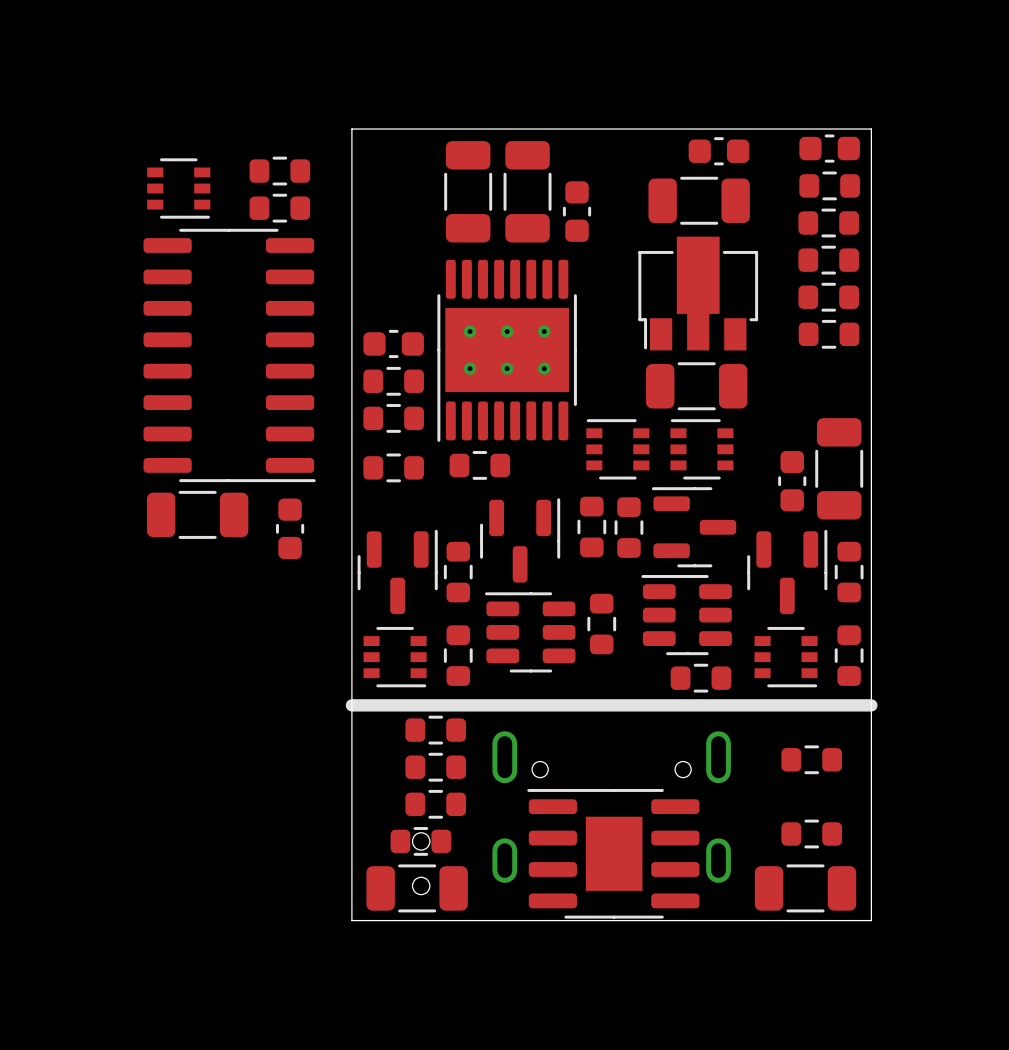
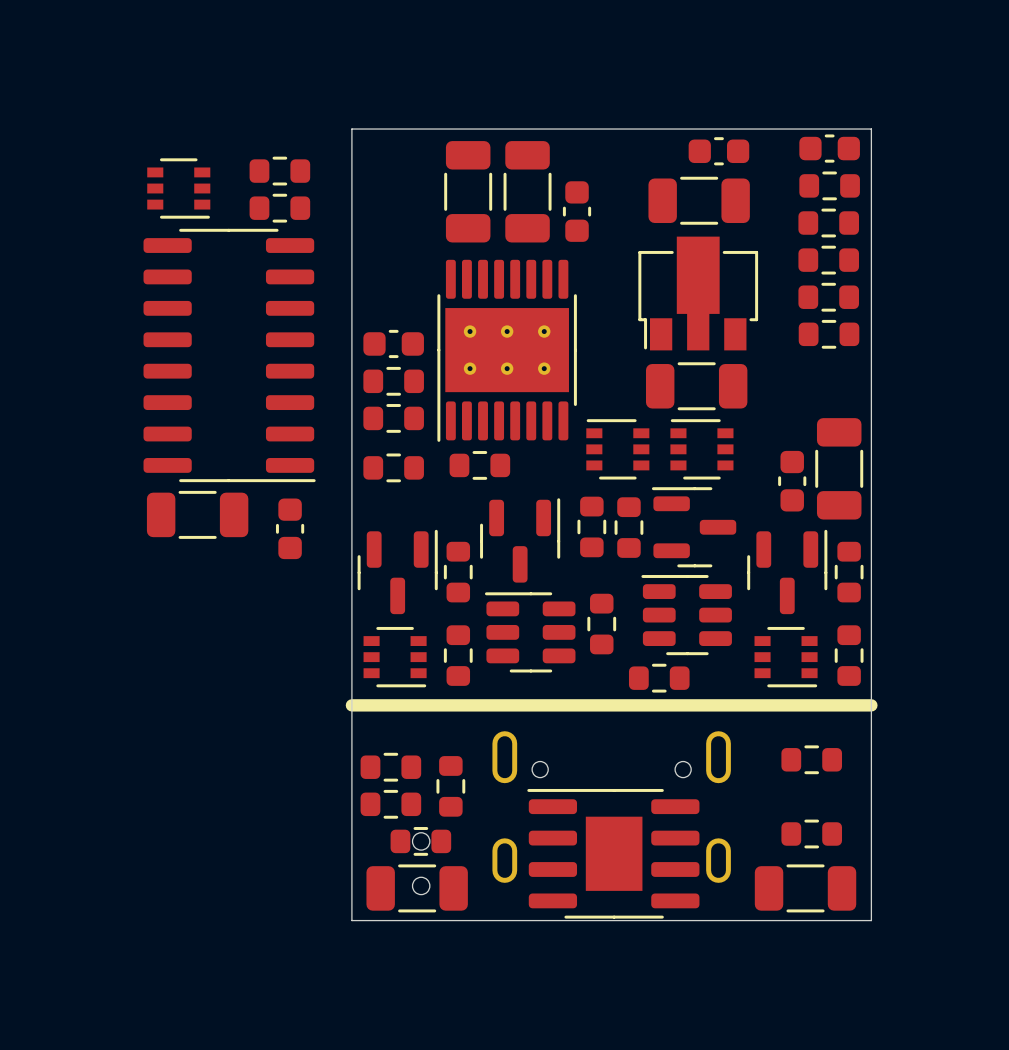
part position: (701, 678) -> (659, 678)
part: (435, 730) -> none
part: none -> (390, 767)
part: (435, 767) -> none
part: none -> (450, 786)
part: none -> (390, 804)
part: (435, 804) -> none

